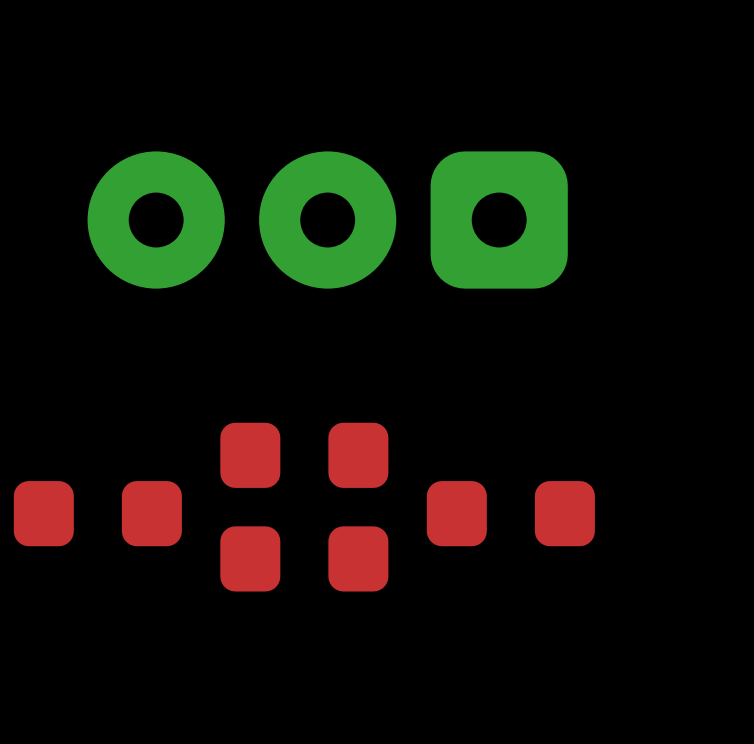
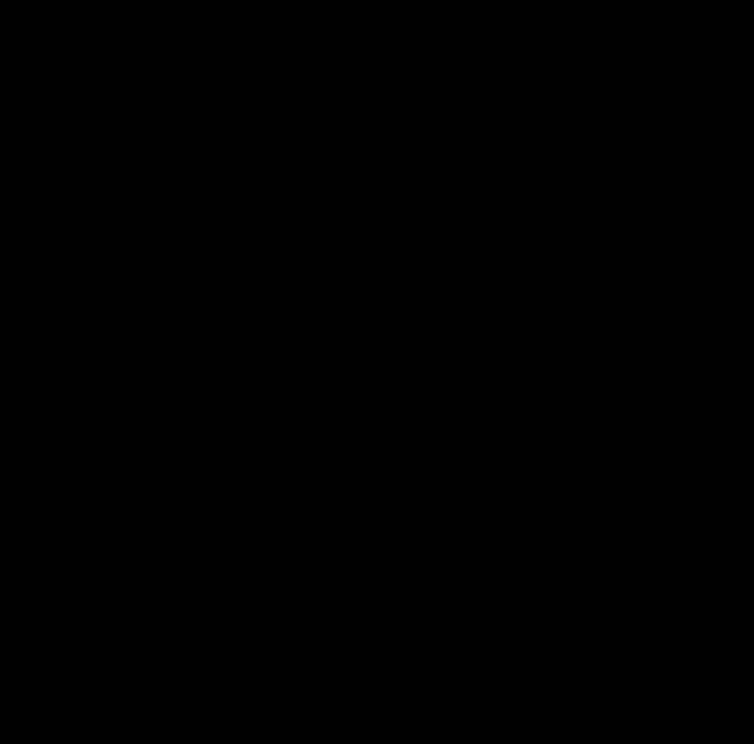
part: (327, 220) -> none
part: (304, 455) -> none
part: (97, 513) -> none
part: (510, 513) -> none
part: (304, 558) -> none

